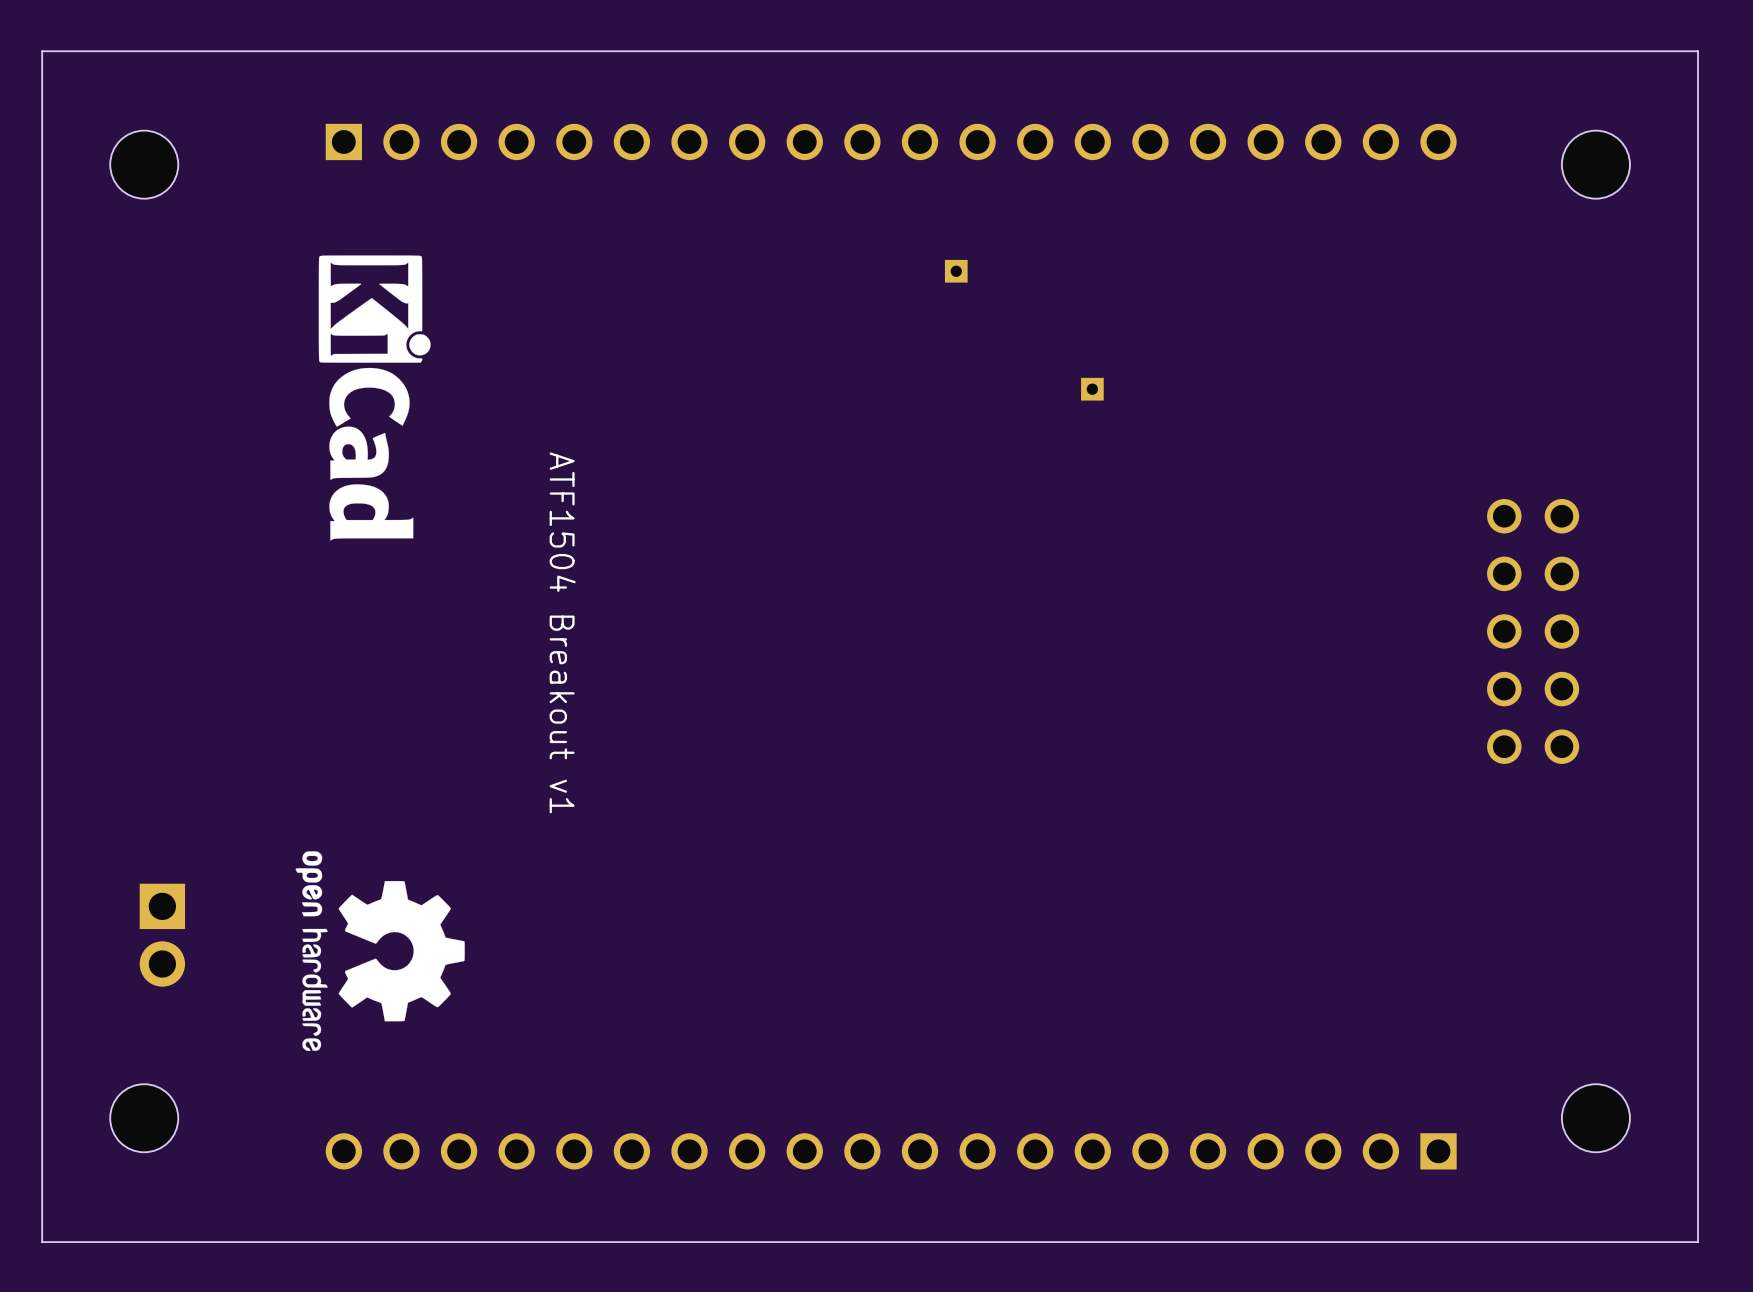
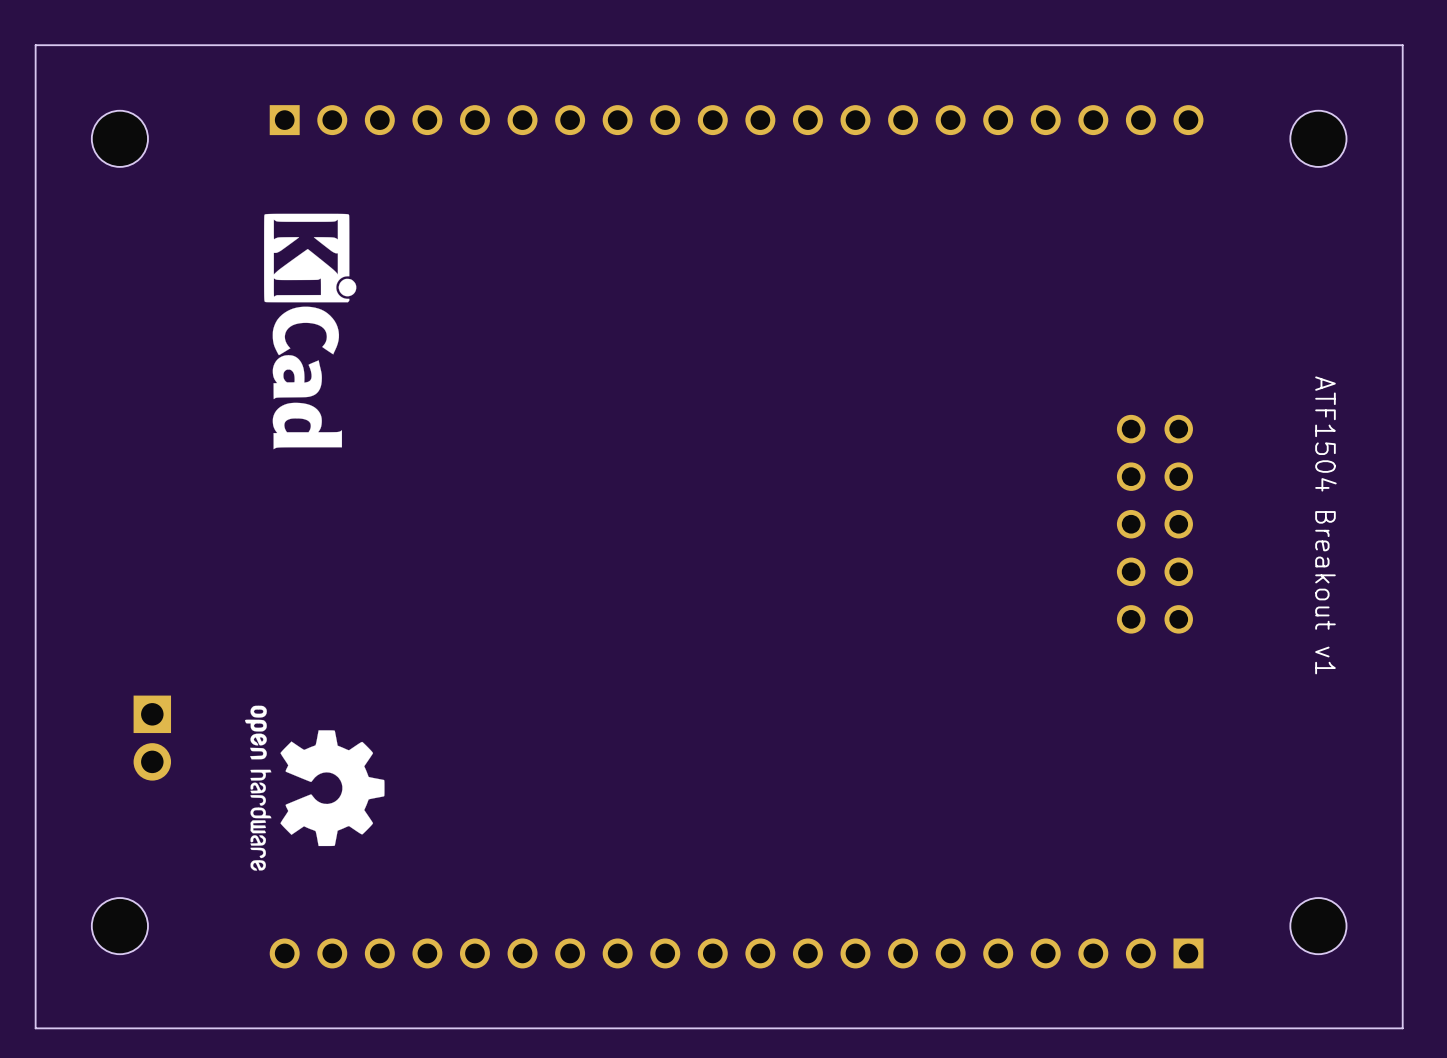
part: (956, 271) -> none
part: (1092, 389) -> none
part position: (1533, 631) -> (1154, 524)
text: ATF1504 Breakout v1 (562, 632) -> none
text: none -> ATF1504 Breakout v1 (1325, 525)
part position: (162, 935) -> (152, 738)

